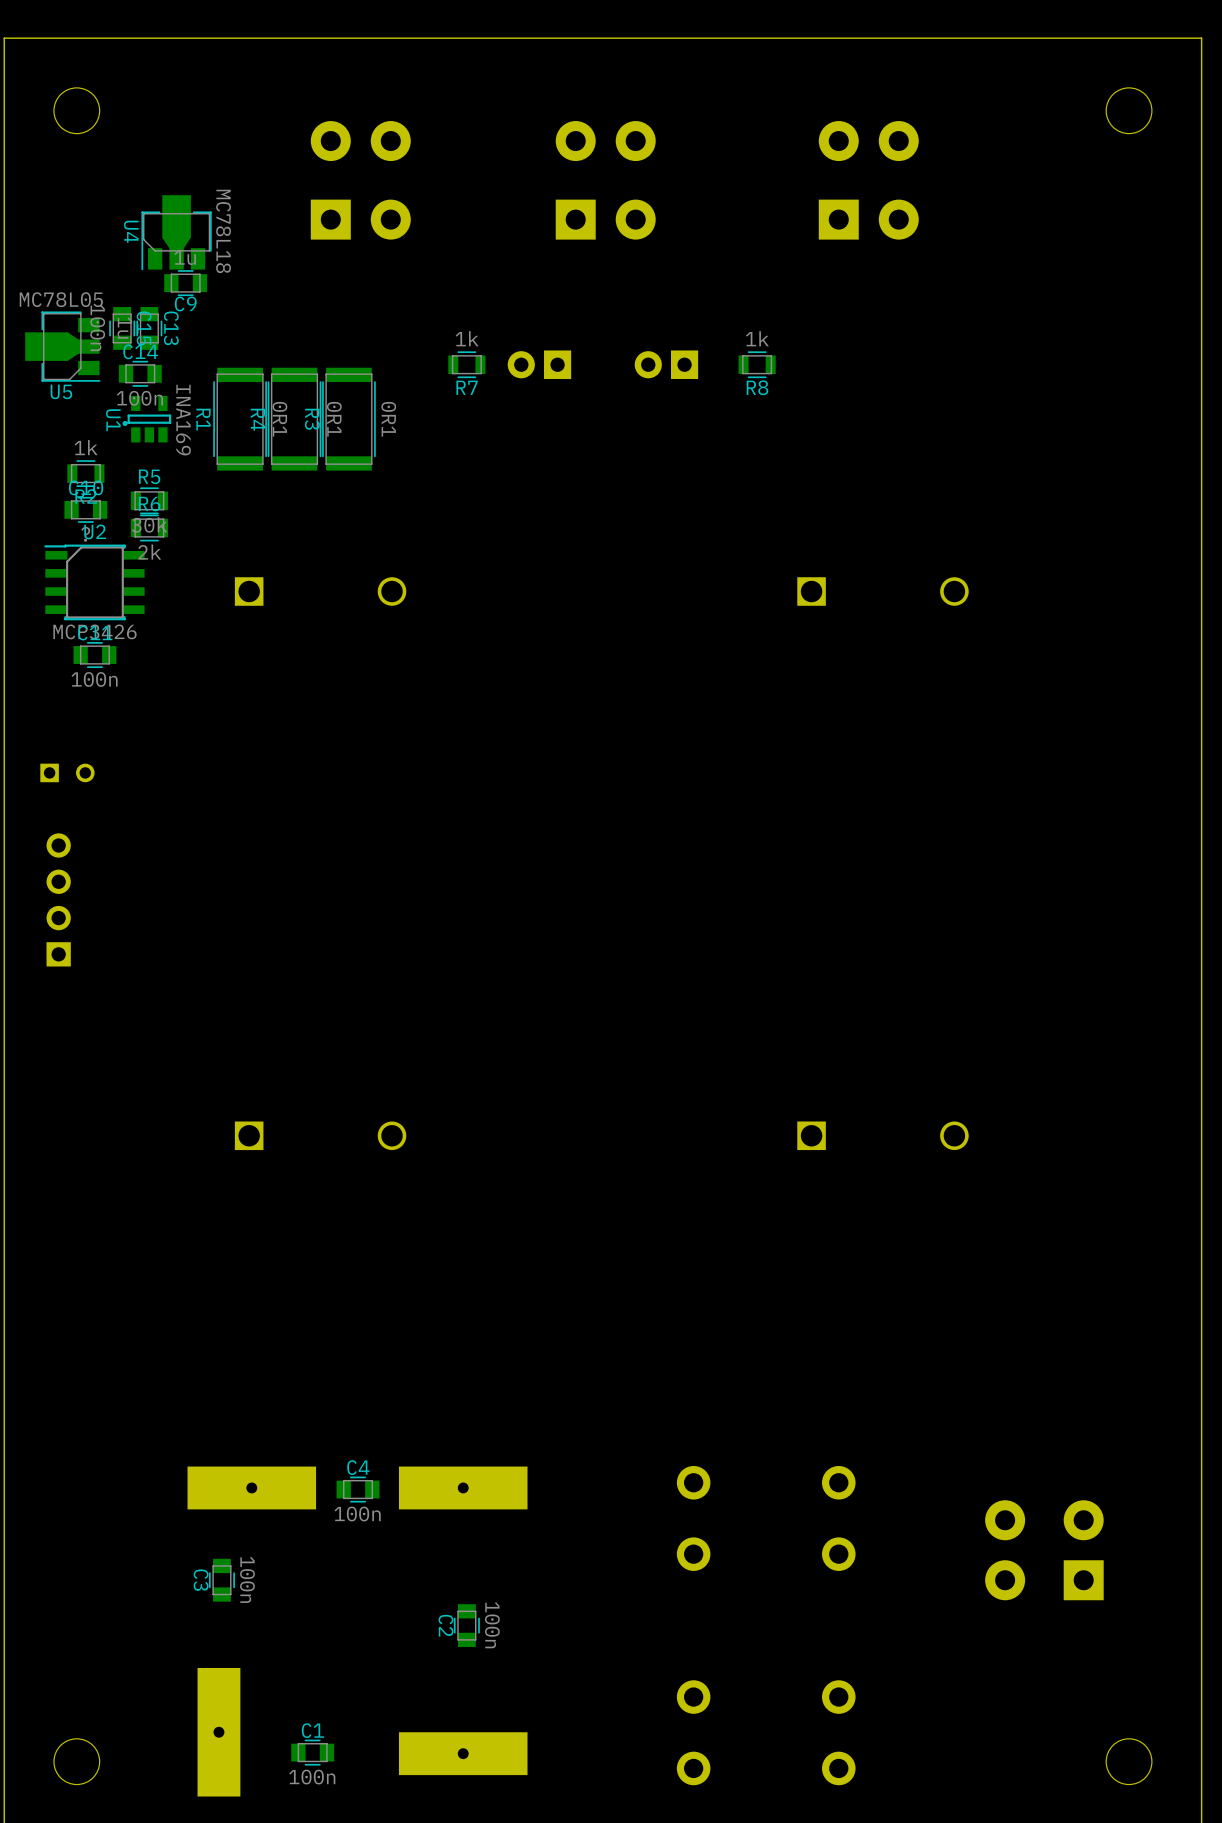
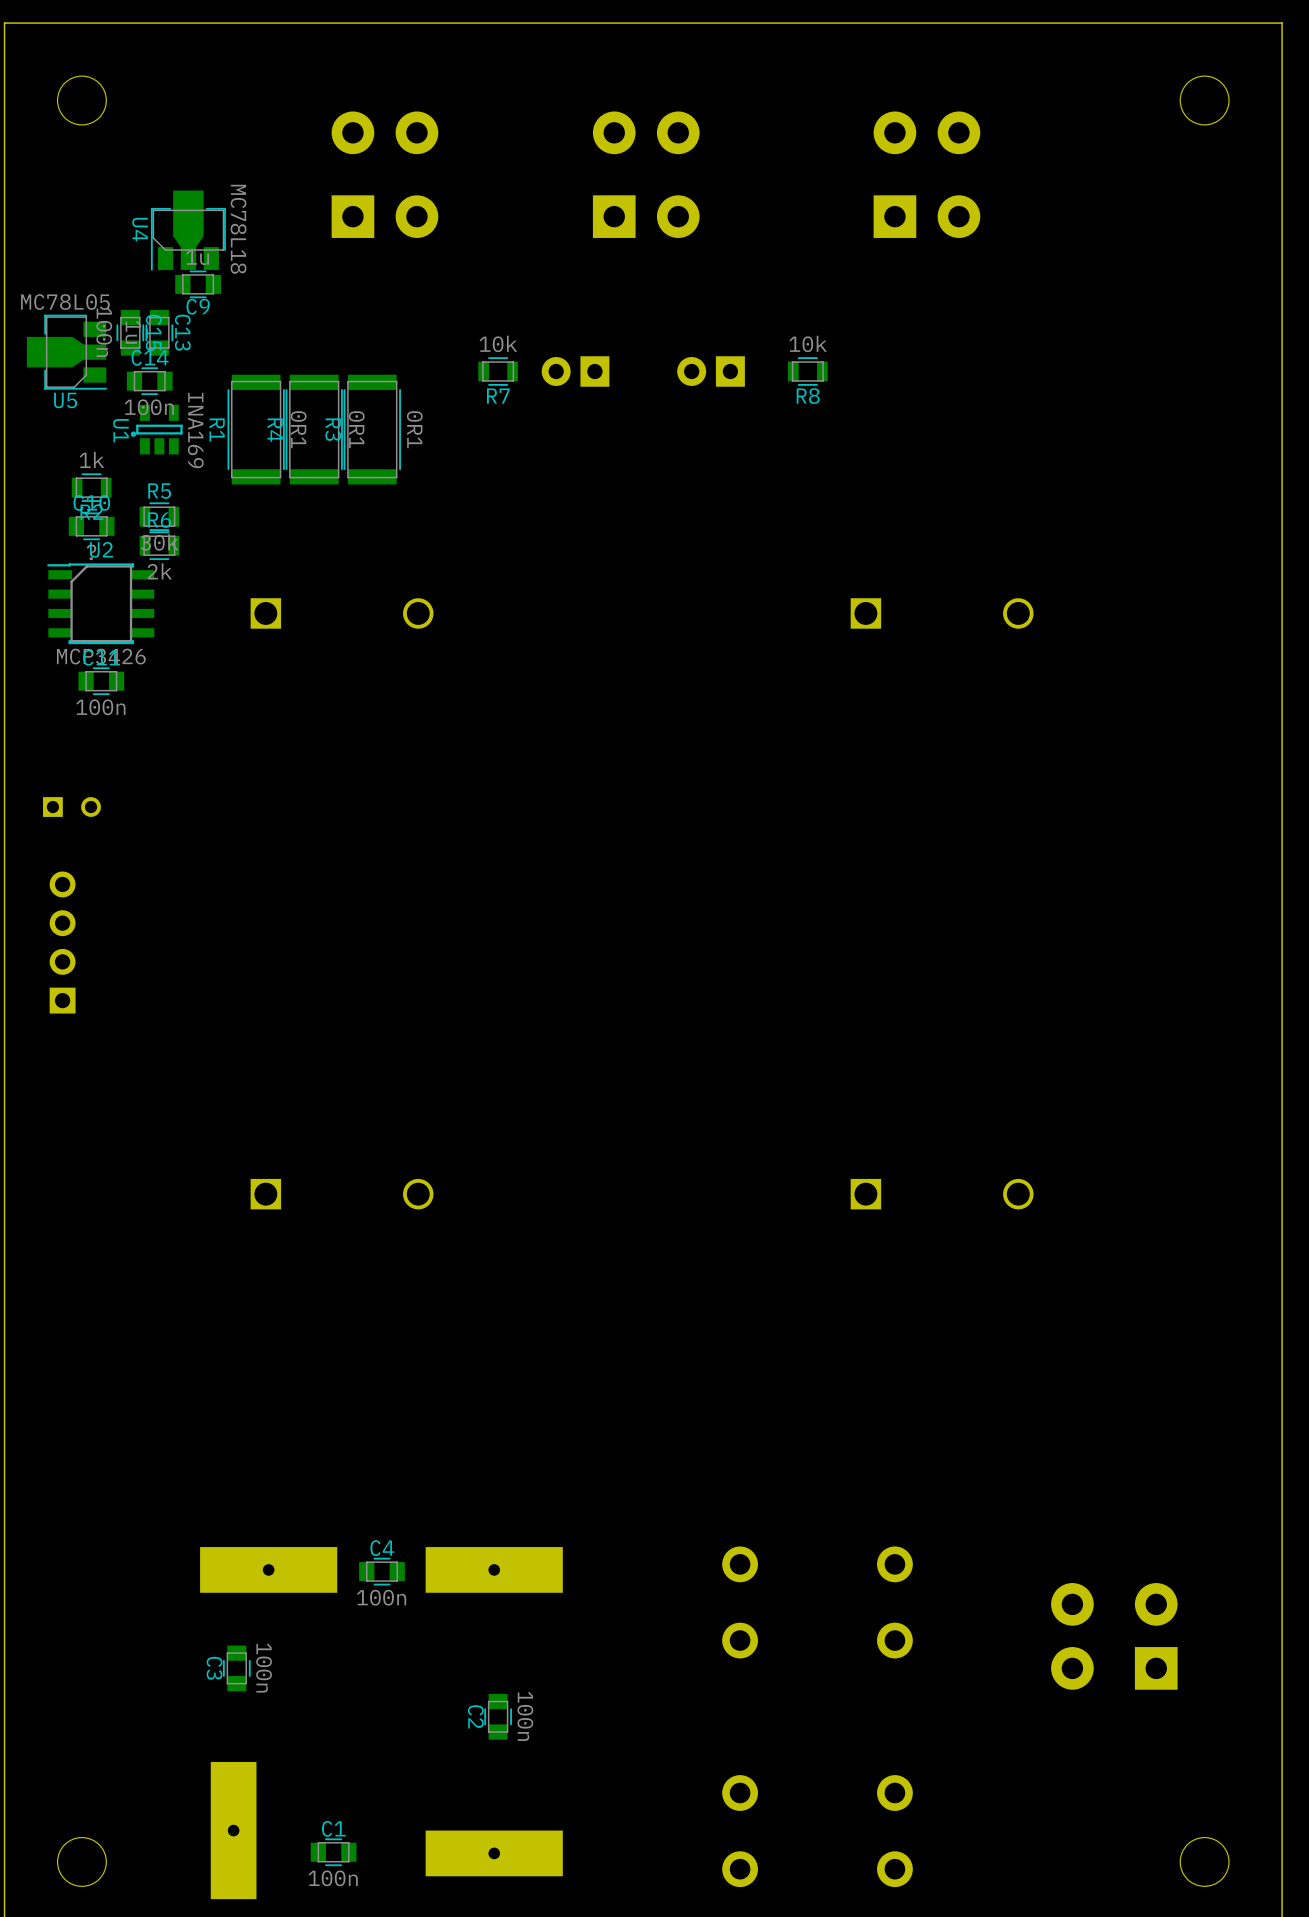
R7 value: 1k (467, 338) -> 10k (498, 343)
R8 value: 1k (757, 338) -> 10k (808, 343)

